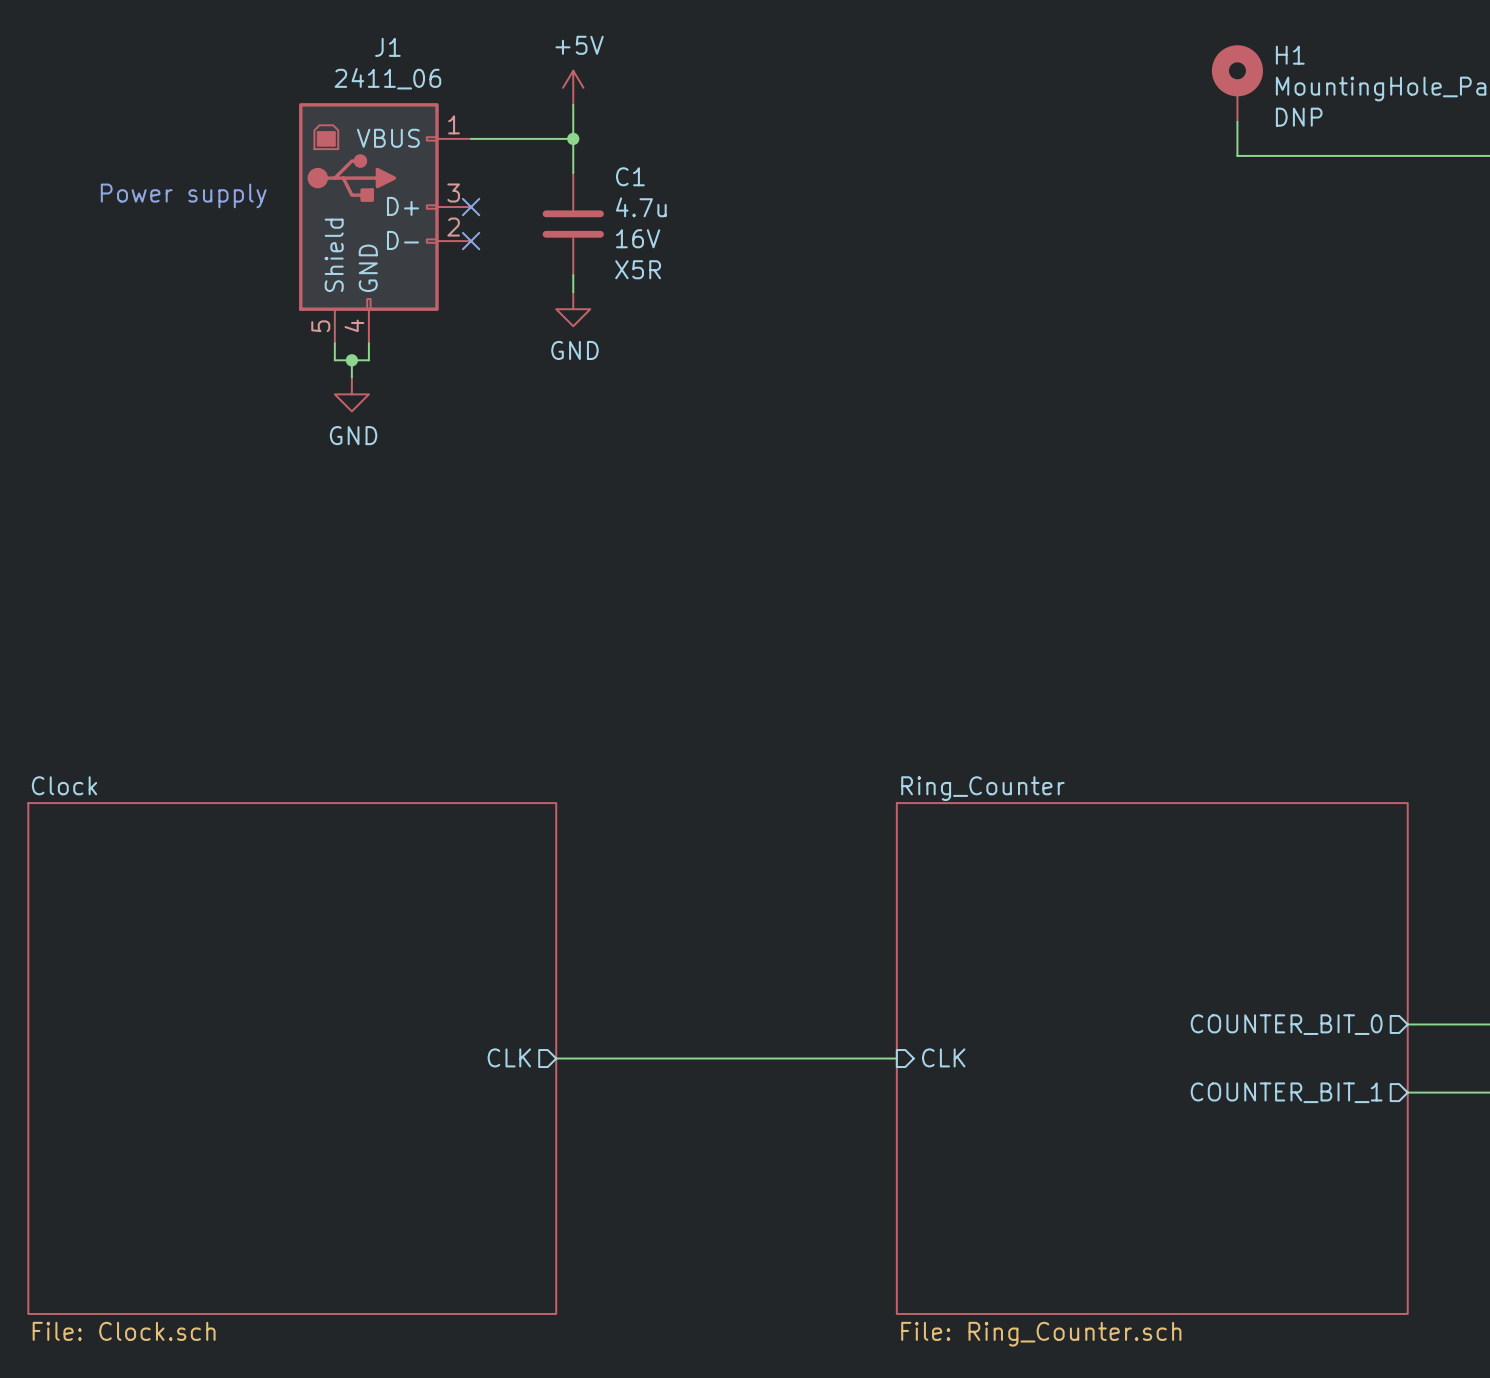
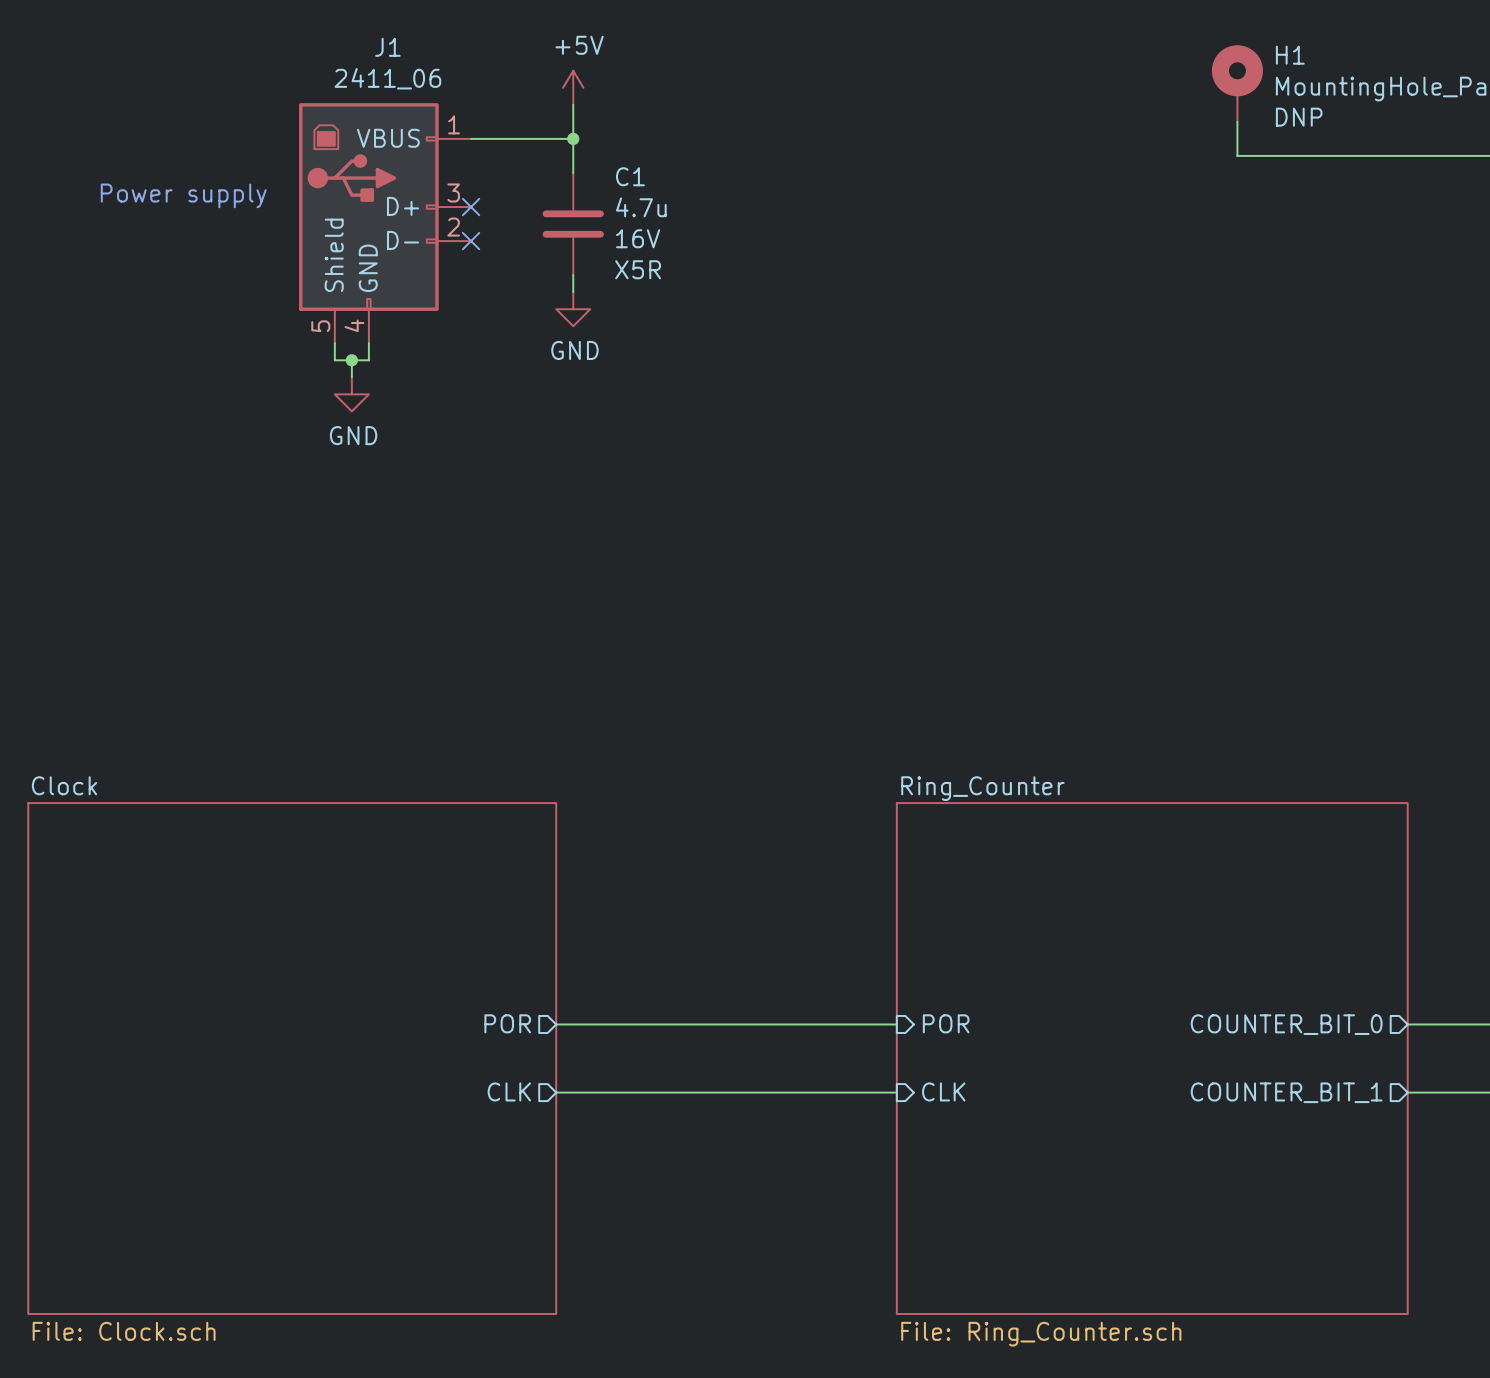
sheet pin: none -> POR (507, 1023)
sheet pin: none -> POR (946, 1023)
sheet pin position: CLK (509, 1057) -> CLK (509, 1091)
sheet pin position: CLK (943, 1057) -> CLK (943, 1091)
wire: (556, 1058) (896, 1058) -> (556, 1024) (896, 1024)
wire: none -> (556, 1092) (896, 1092)

